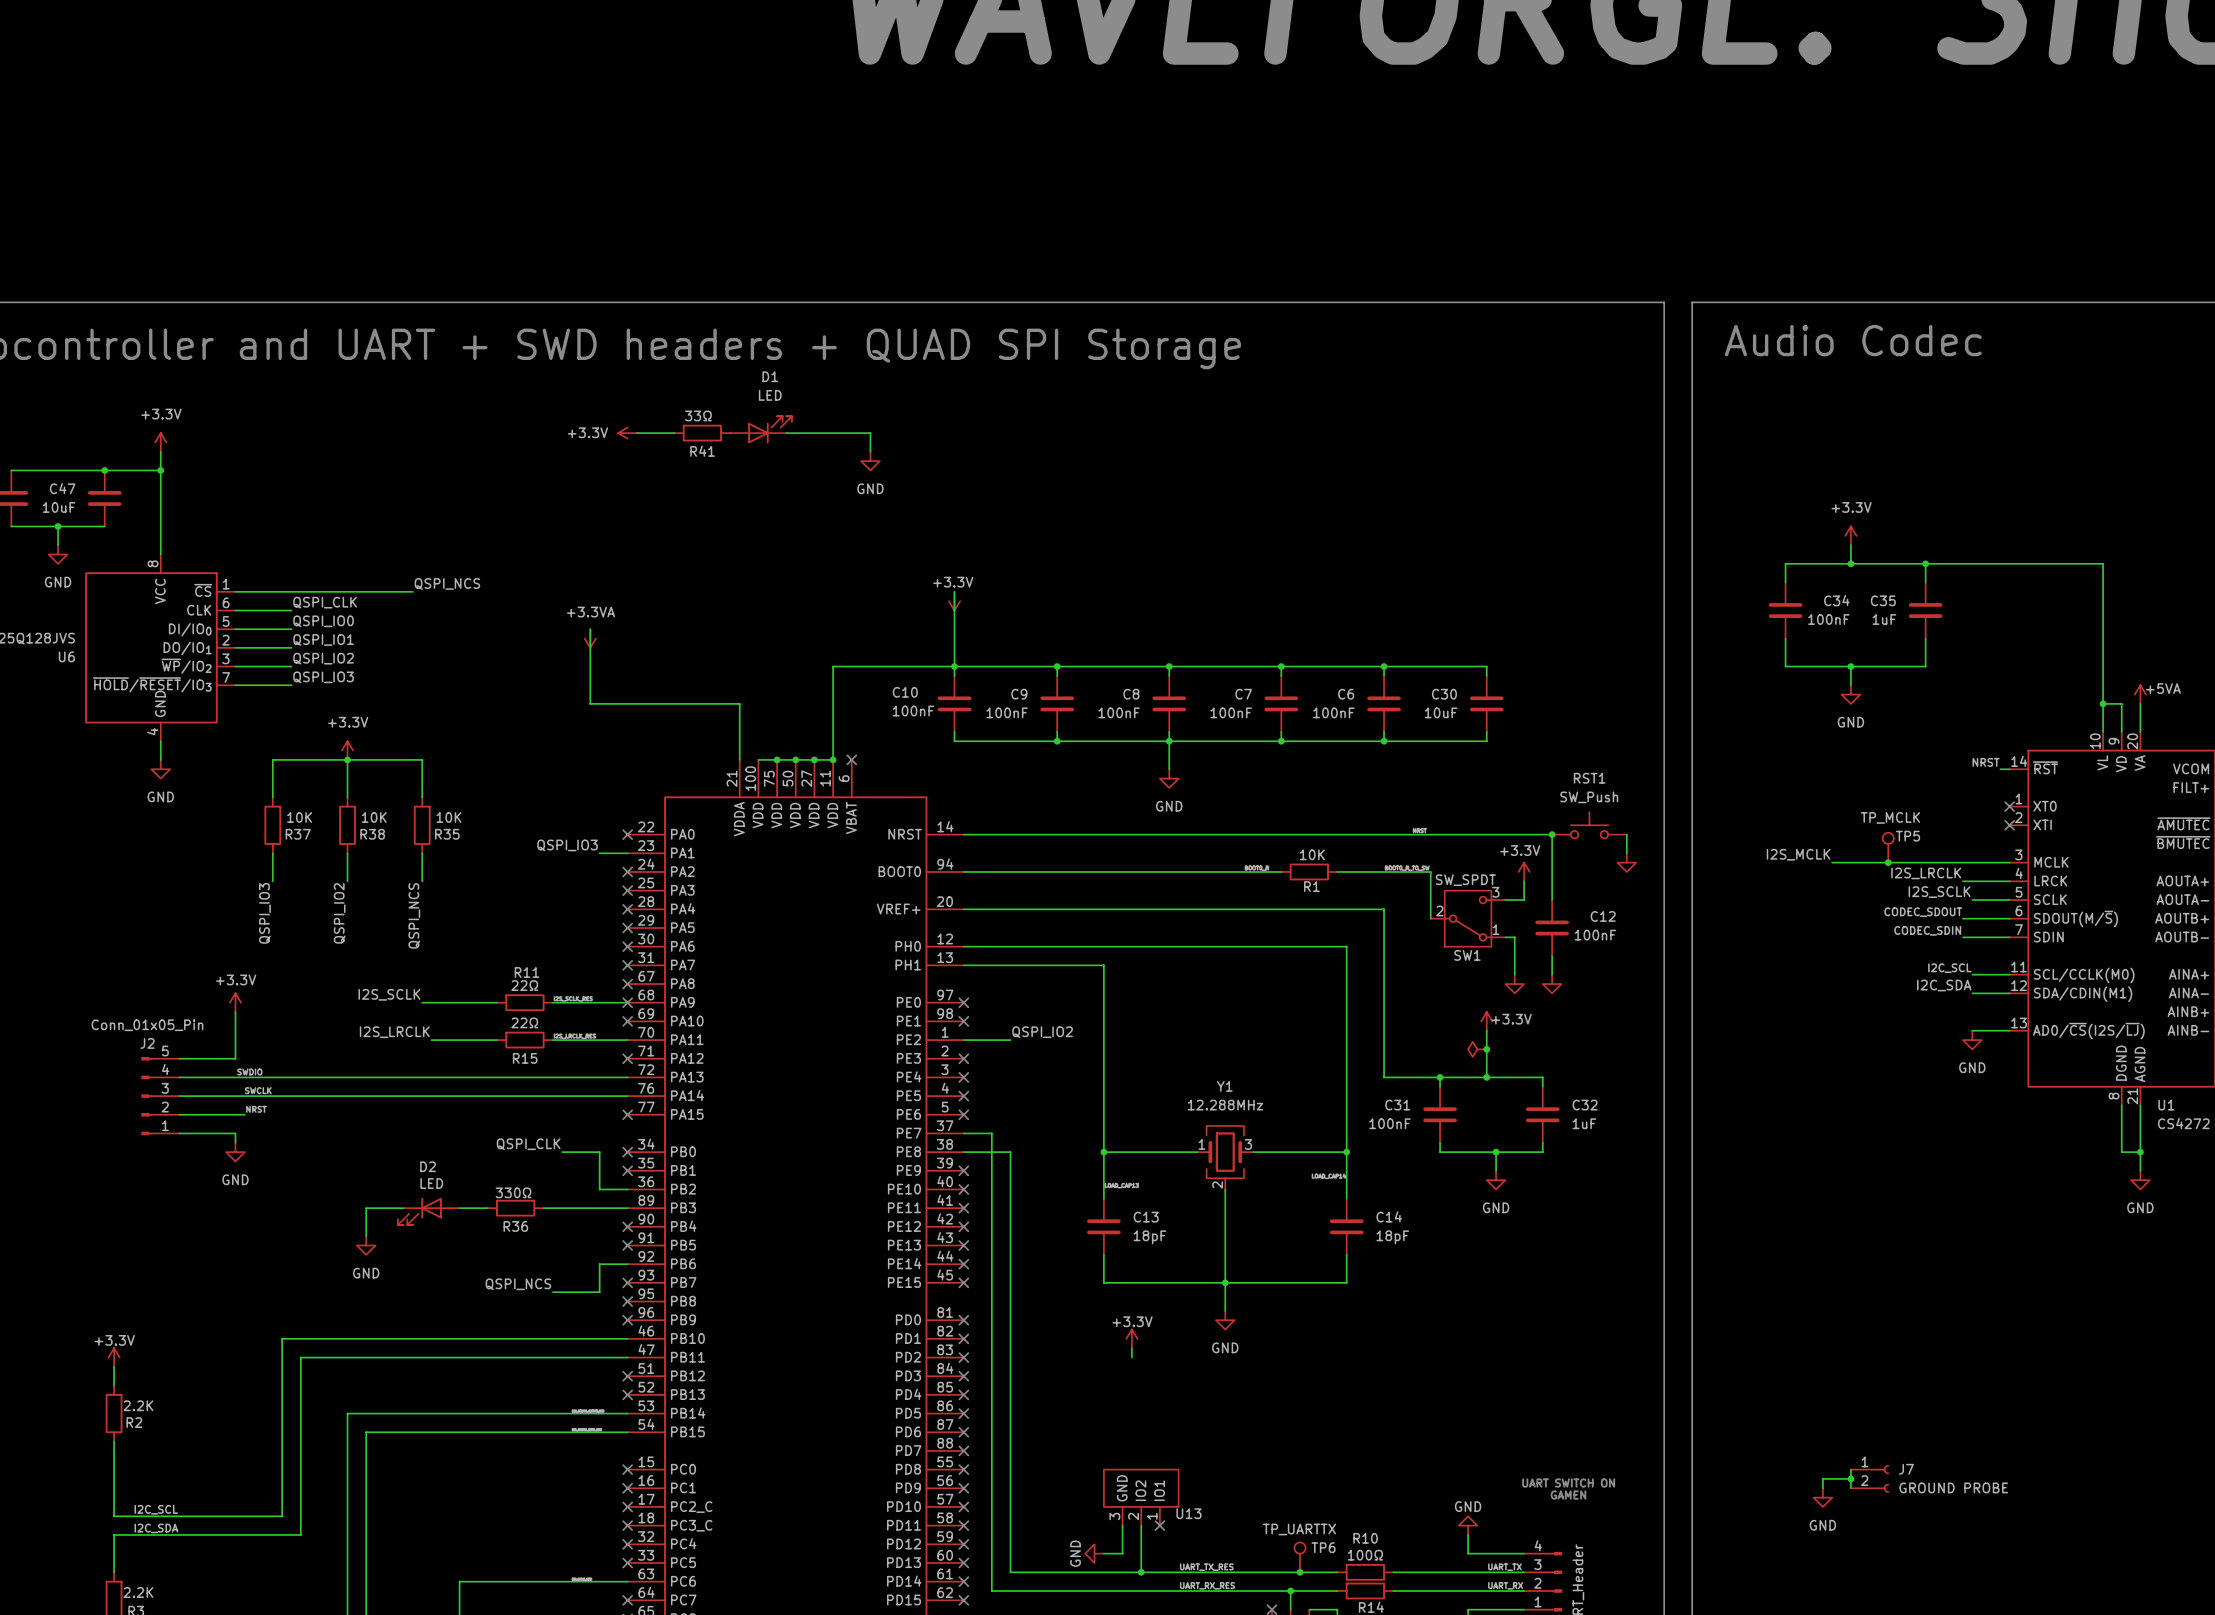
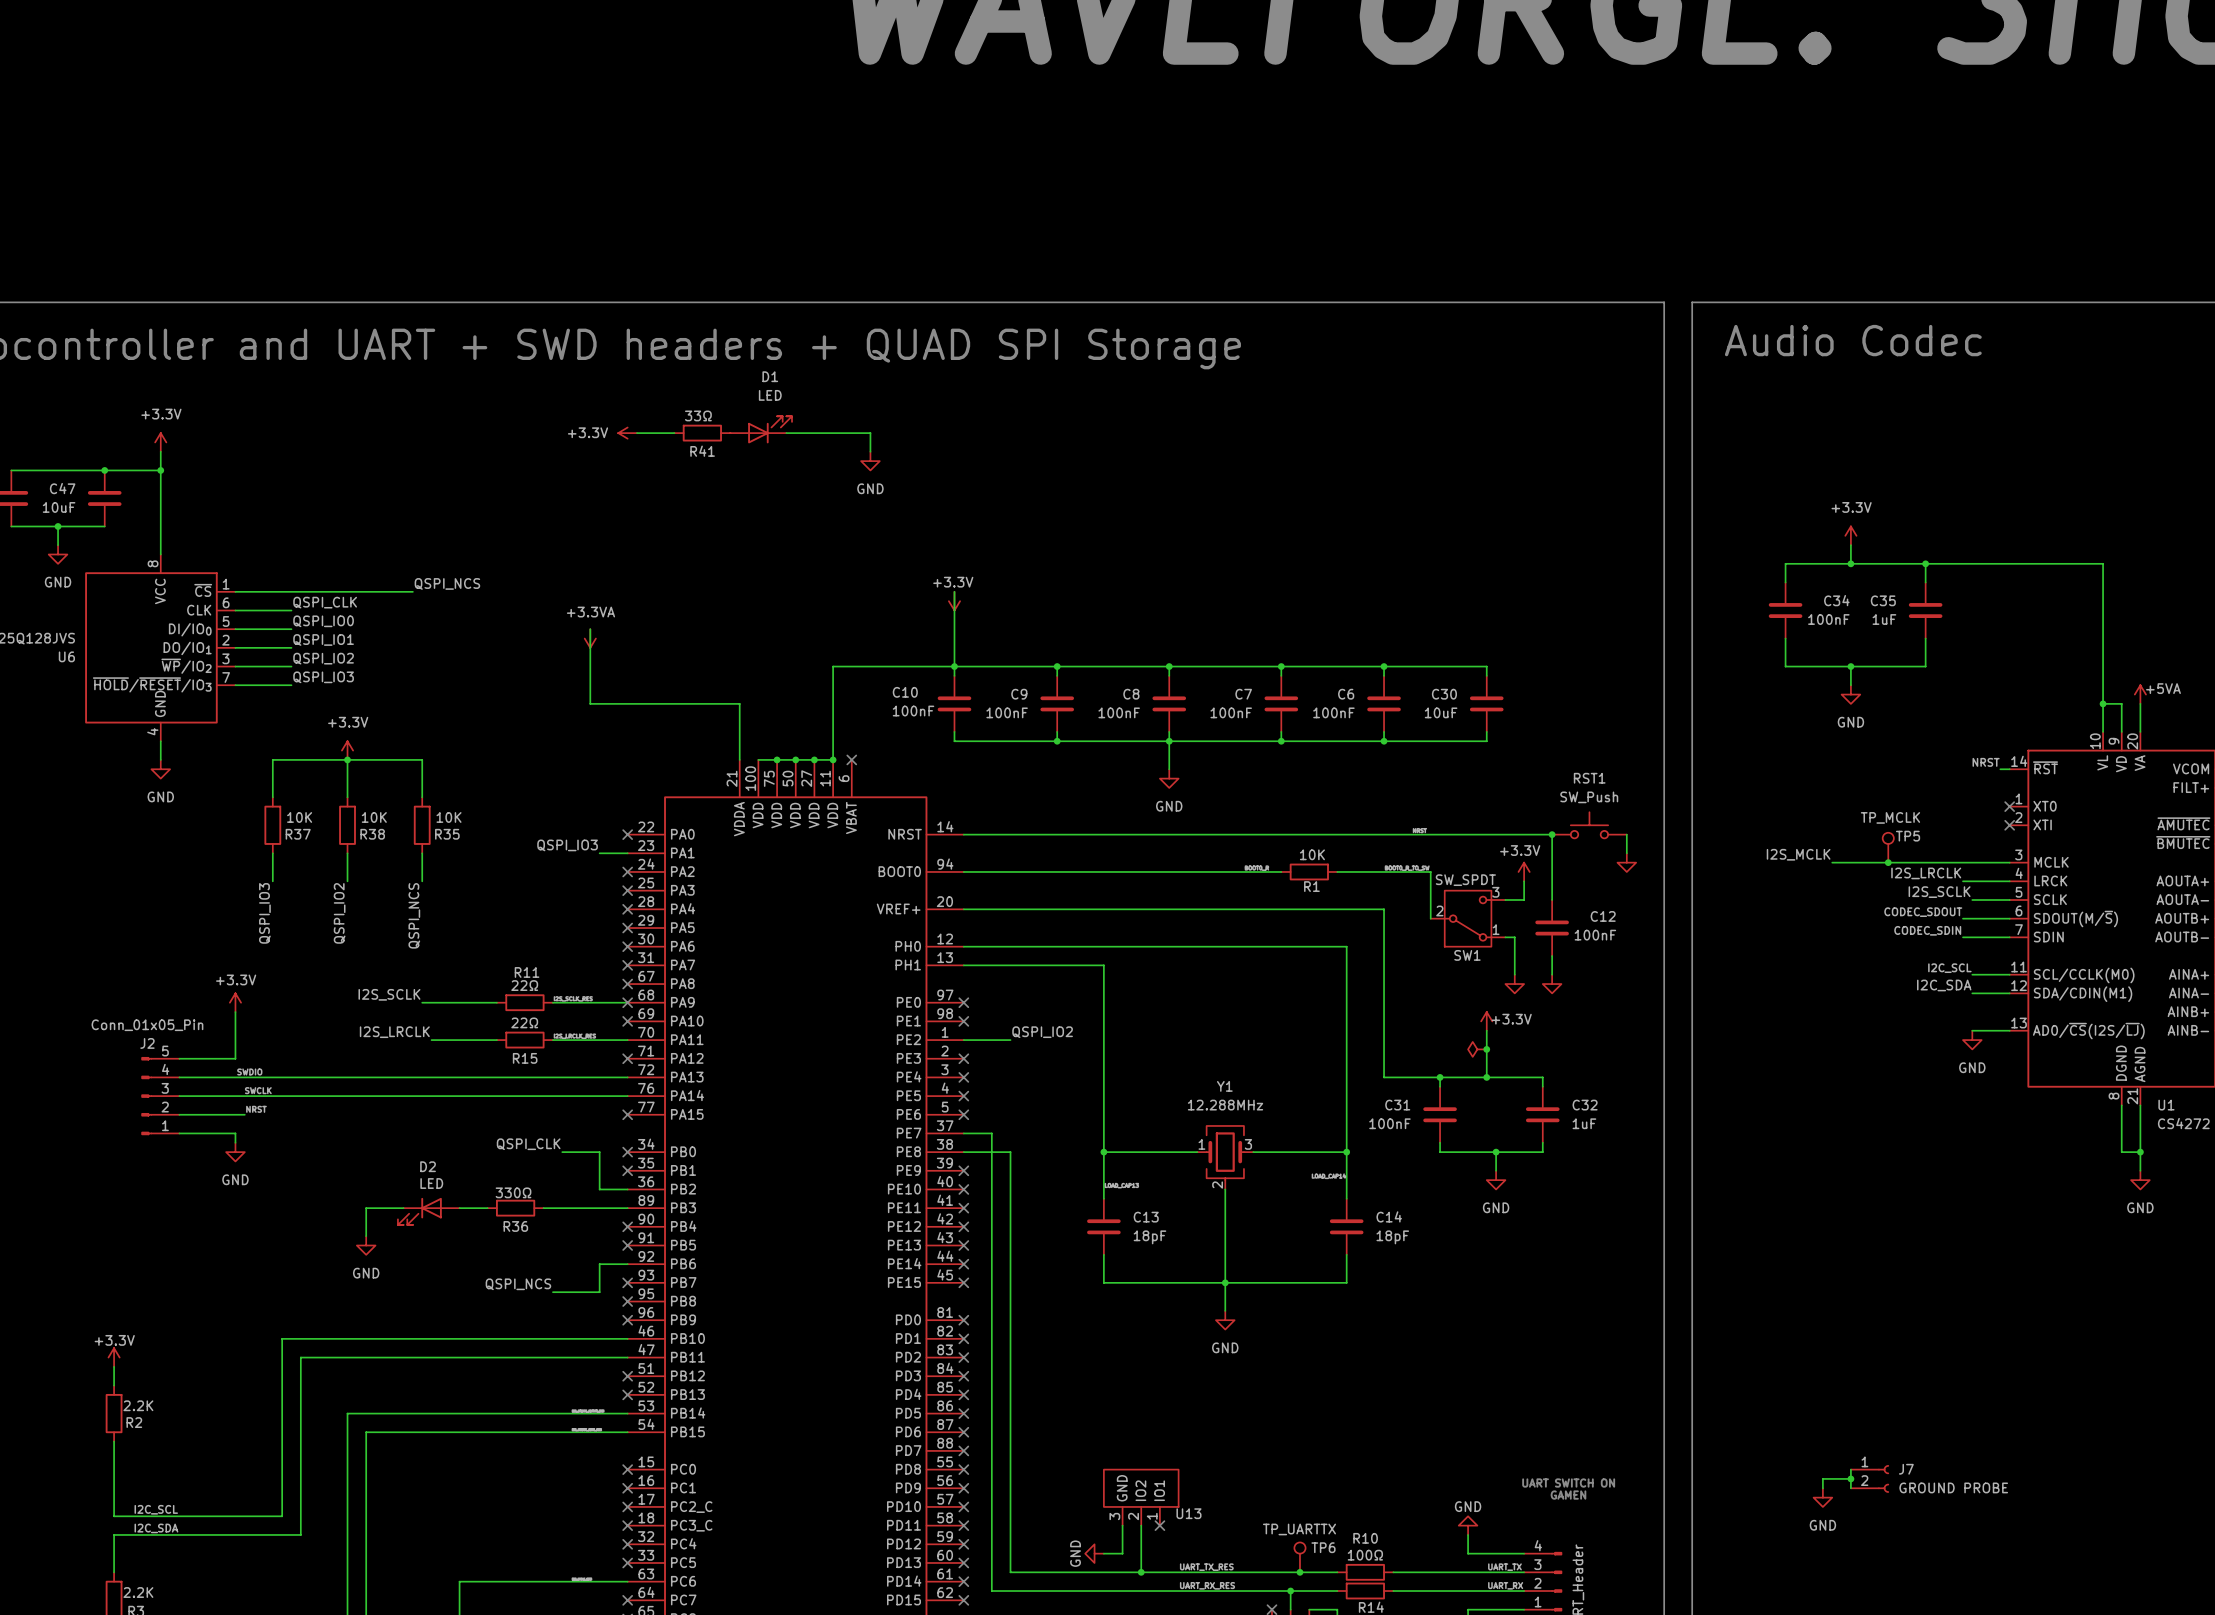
power symbol: +3.3V (1131, 1338) -> none
wire: (1131, 1348) (1131, 1357) -> none

